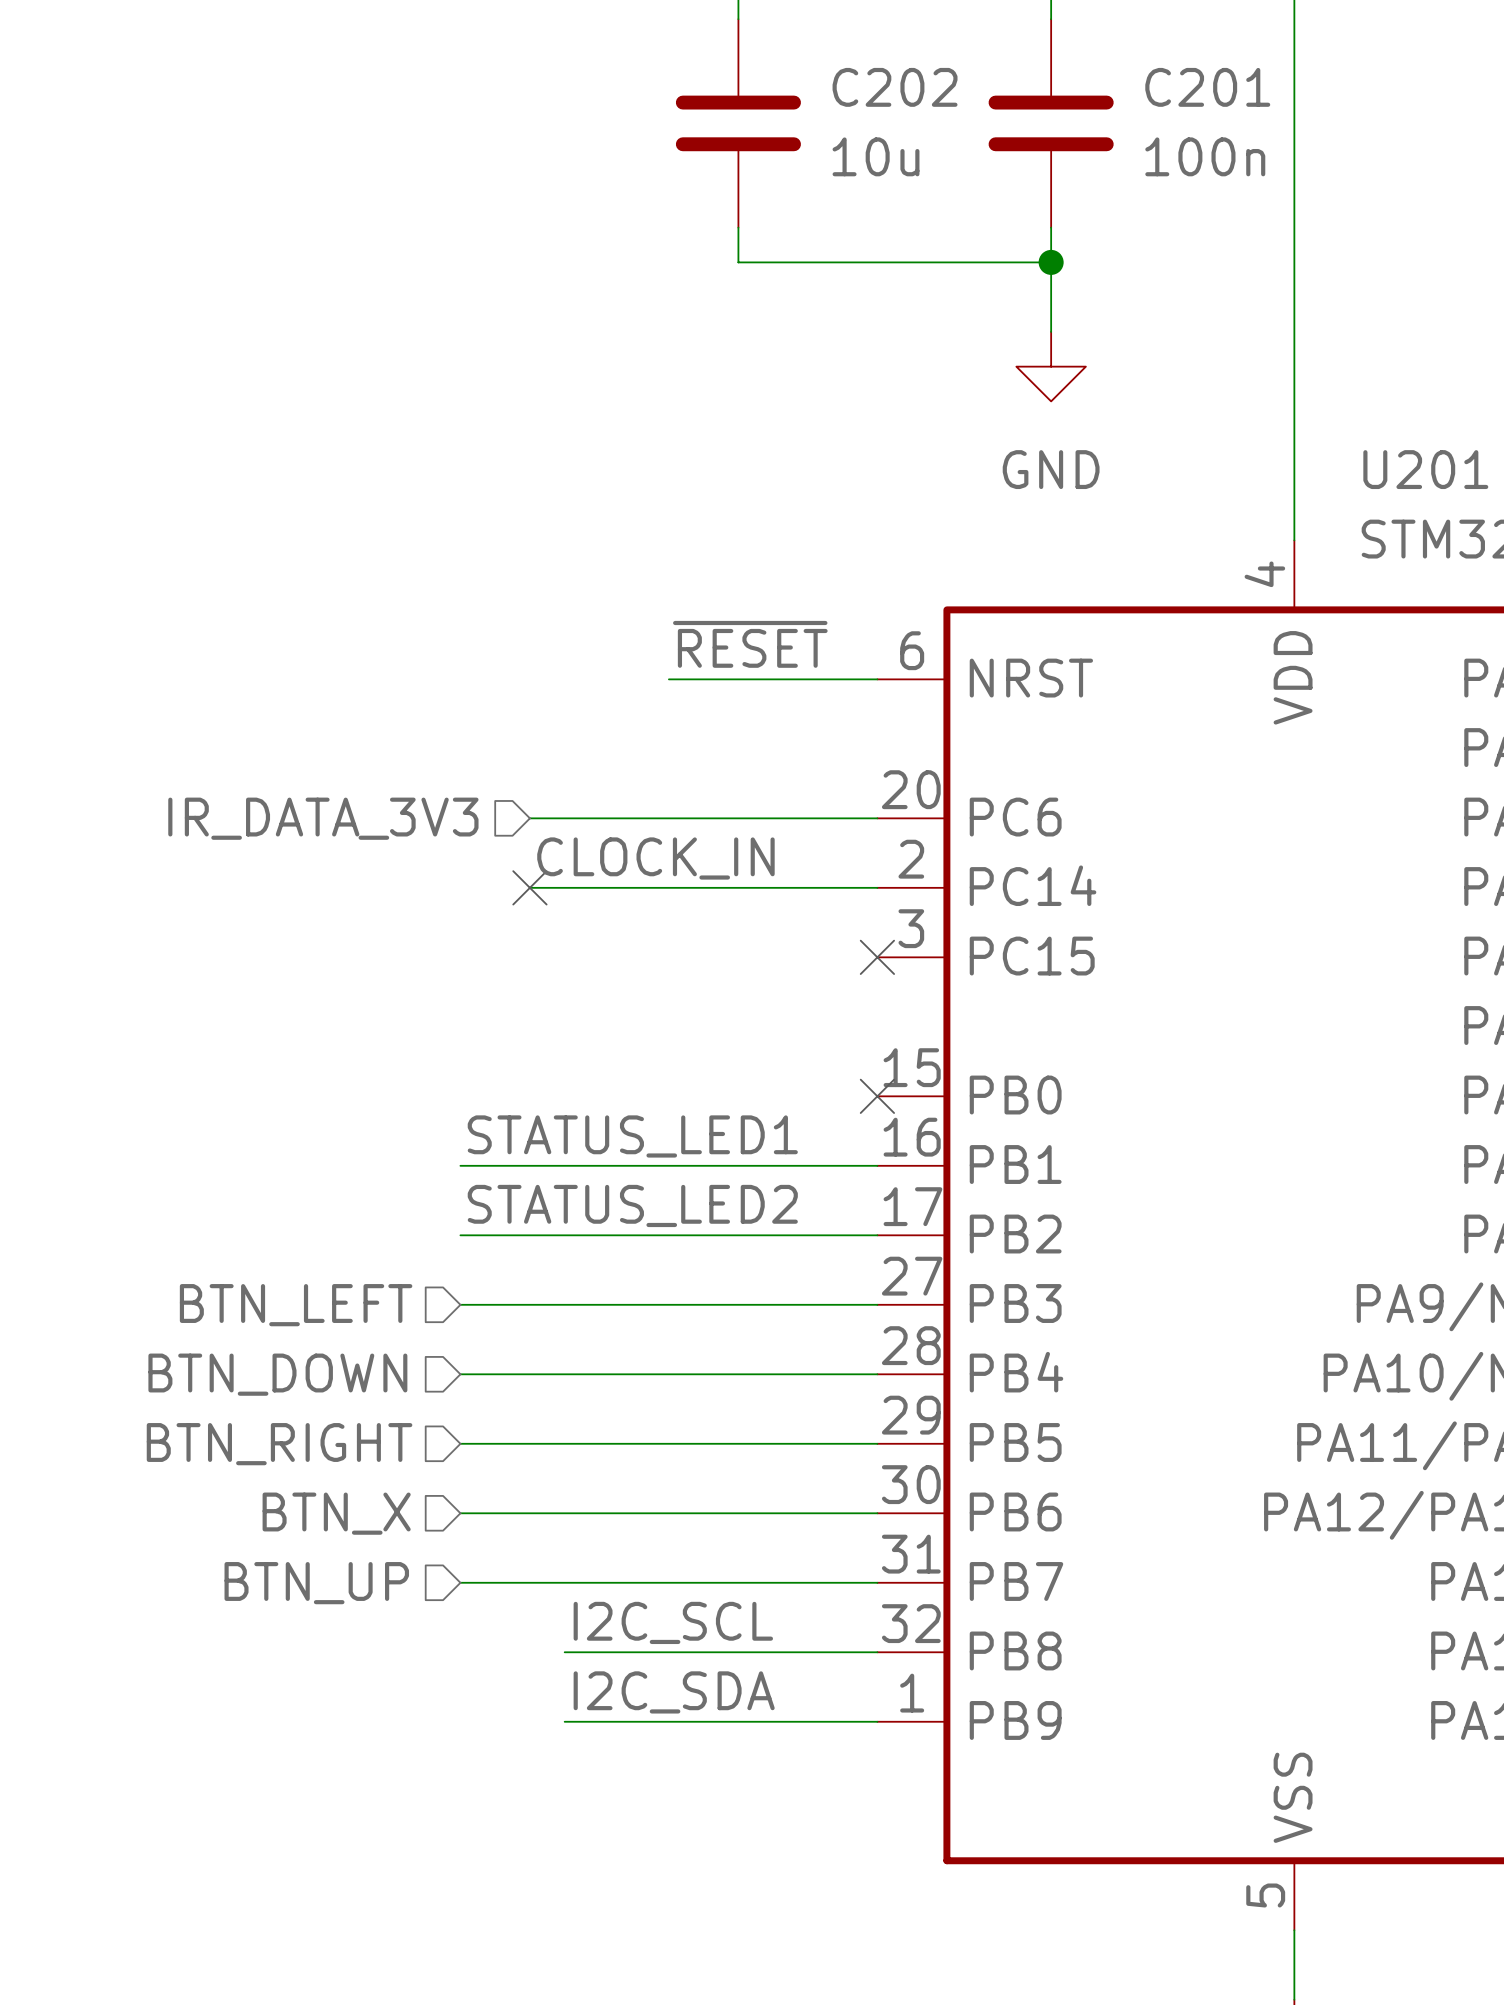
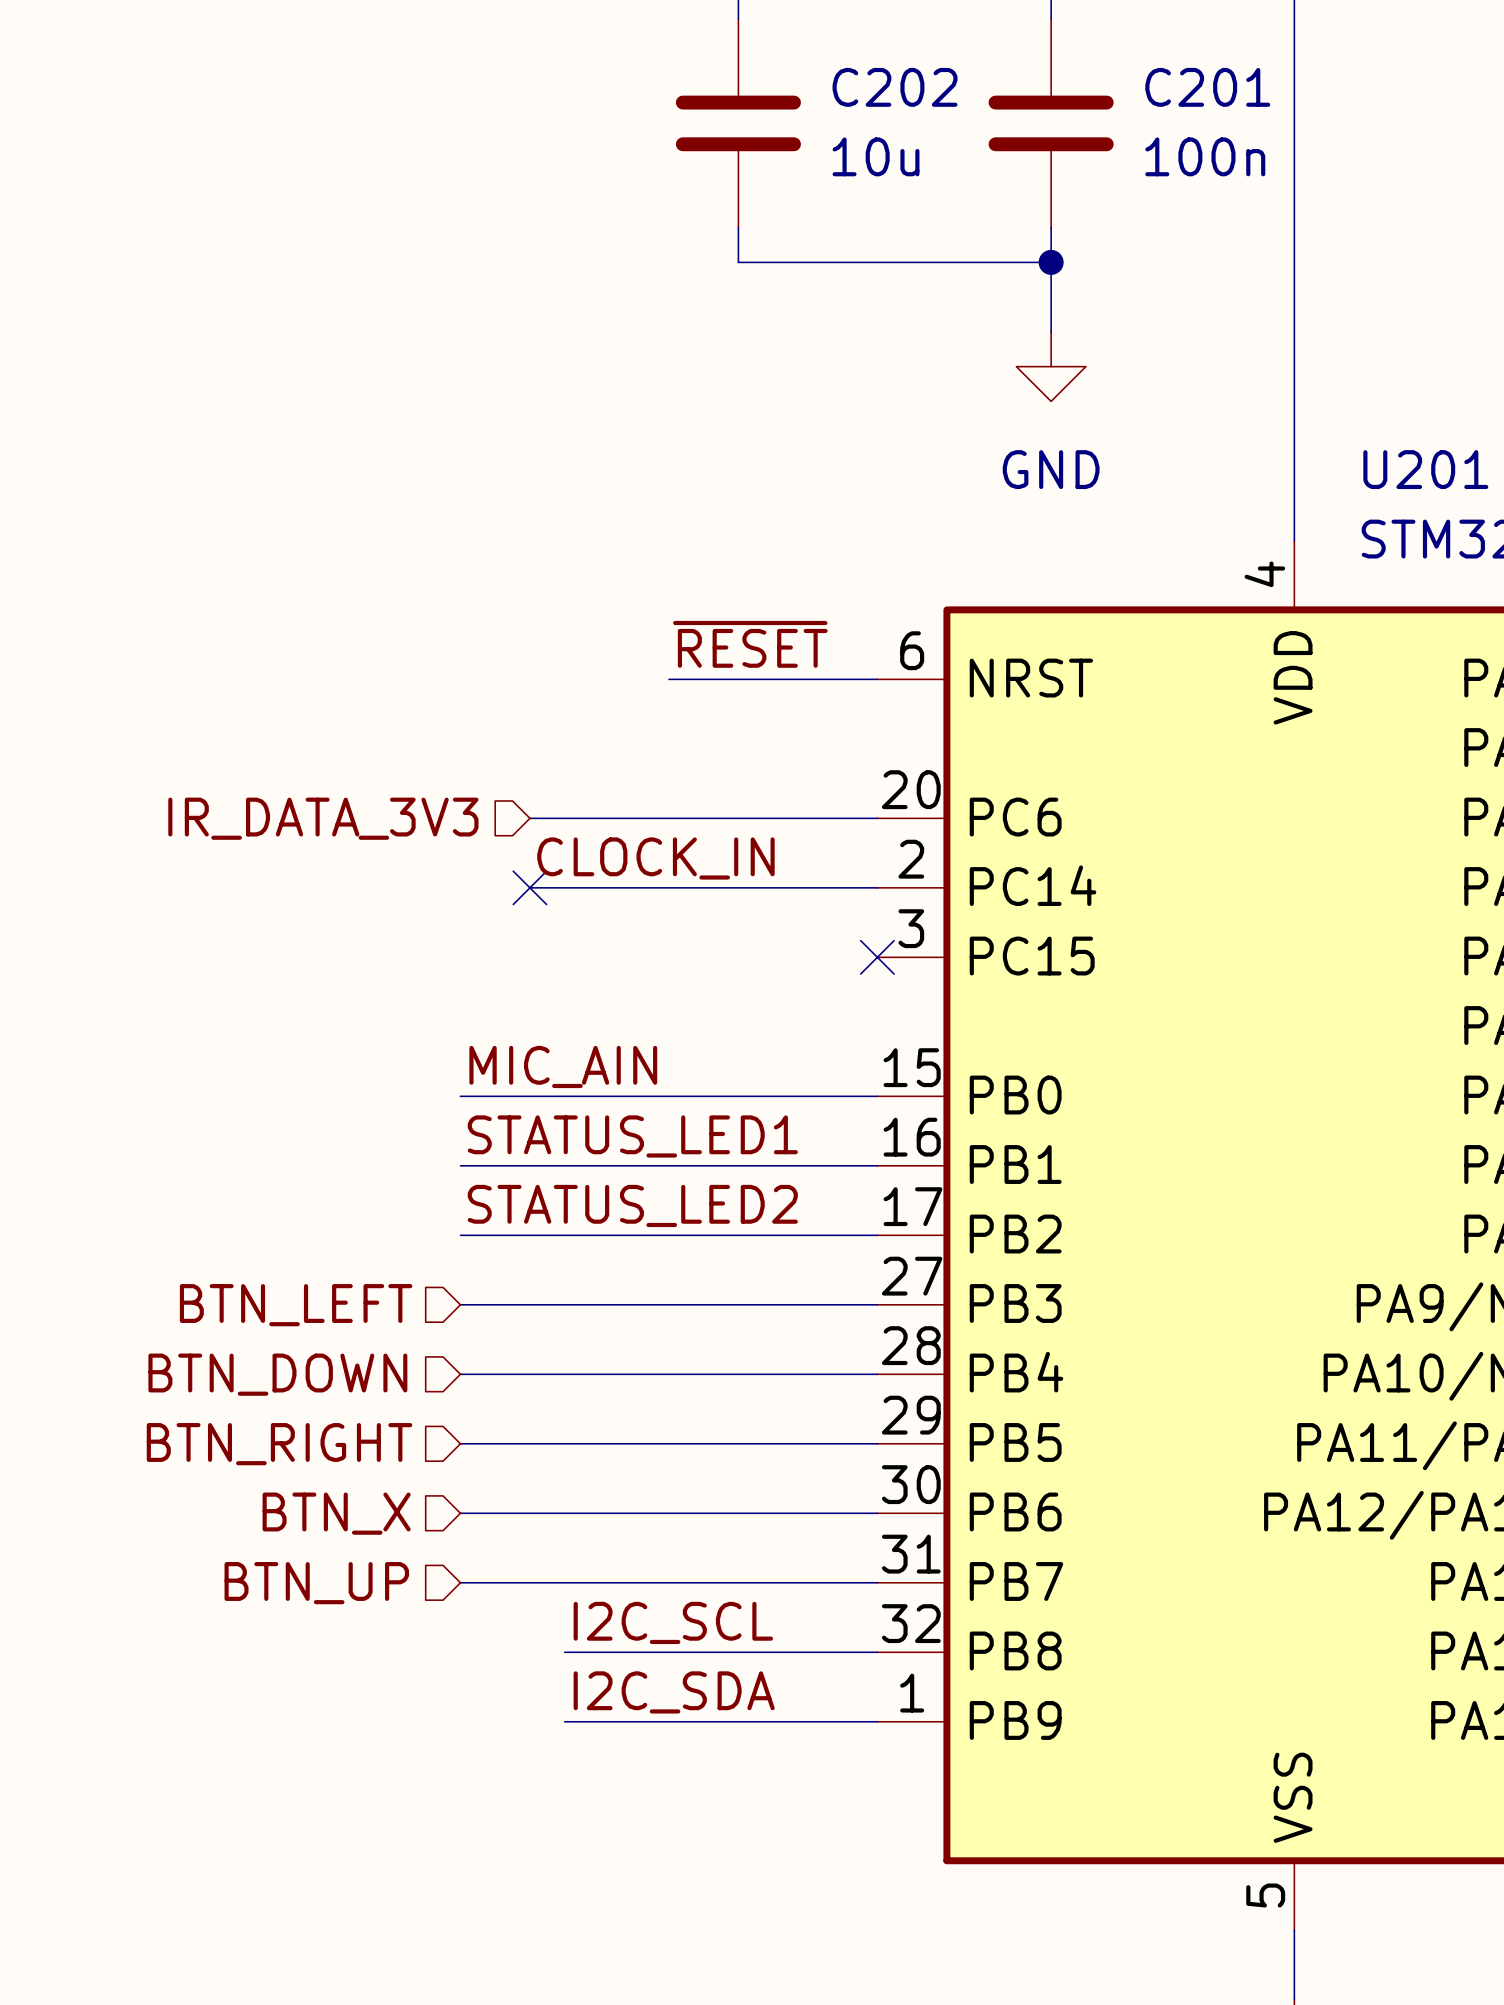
label: none -> MIC_AIN (563, 1066)
wire: none -> (460, 1096) (877, 1096)
no-connect mark: (877, 1096) -> none

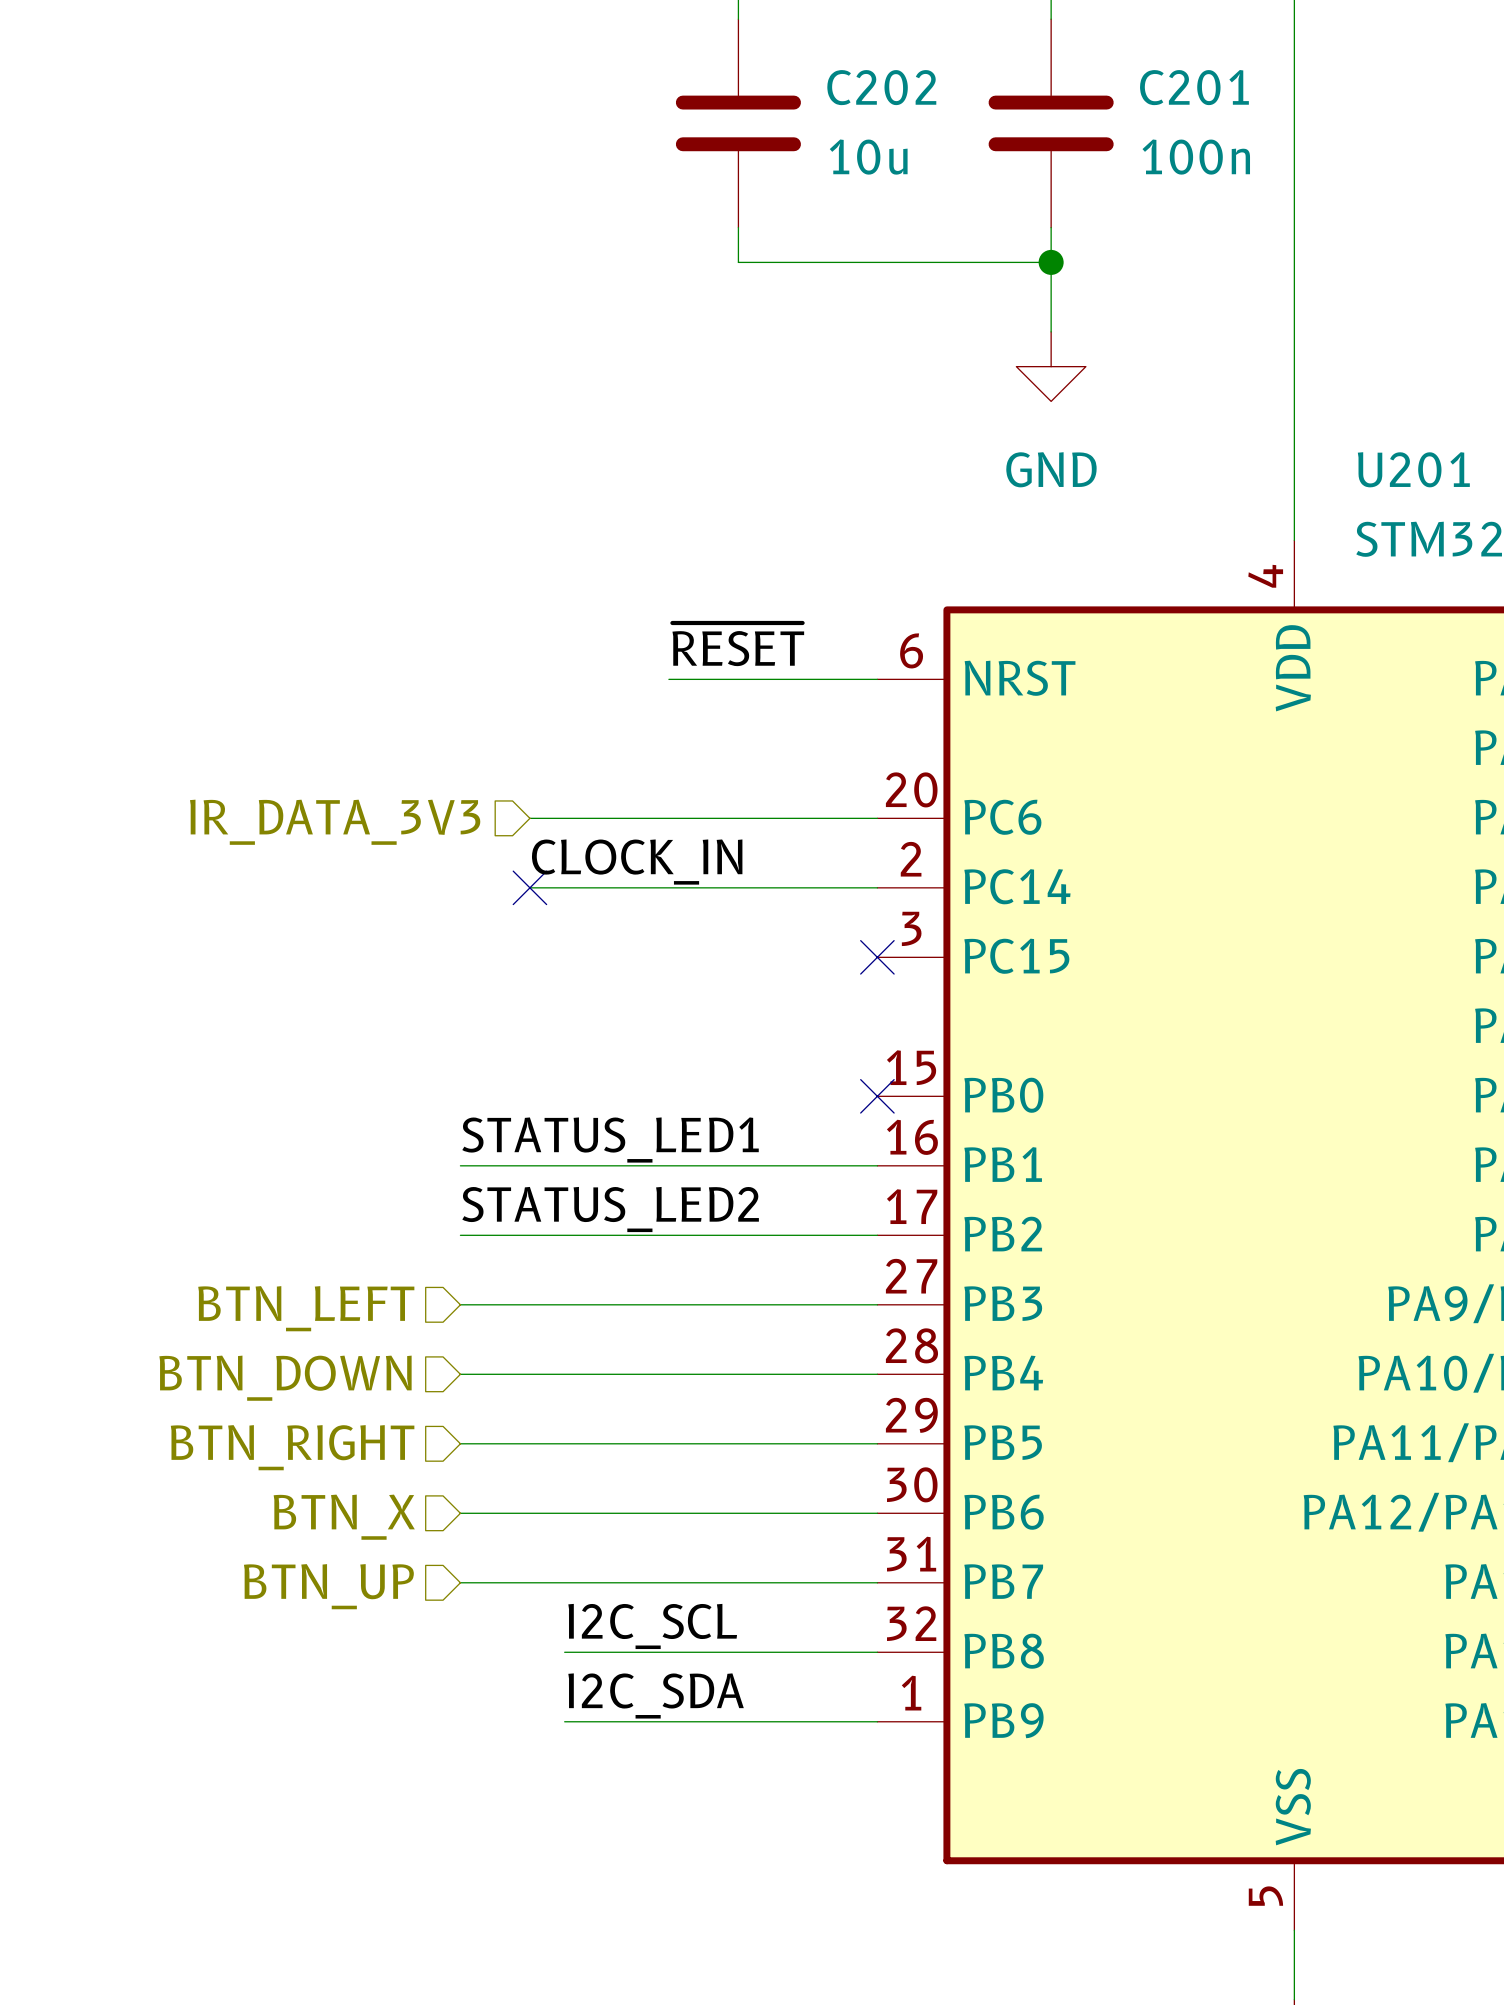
label: MIC_AIN (563, 1066) -> none
wire: (460, 1096) (877, 1096) -> none
no-connect mark: none -> (877, 1096)

